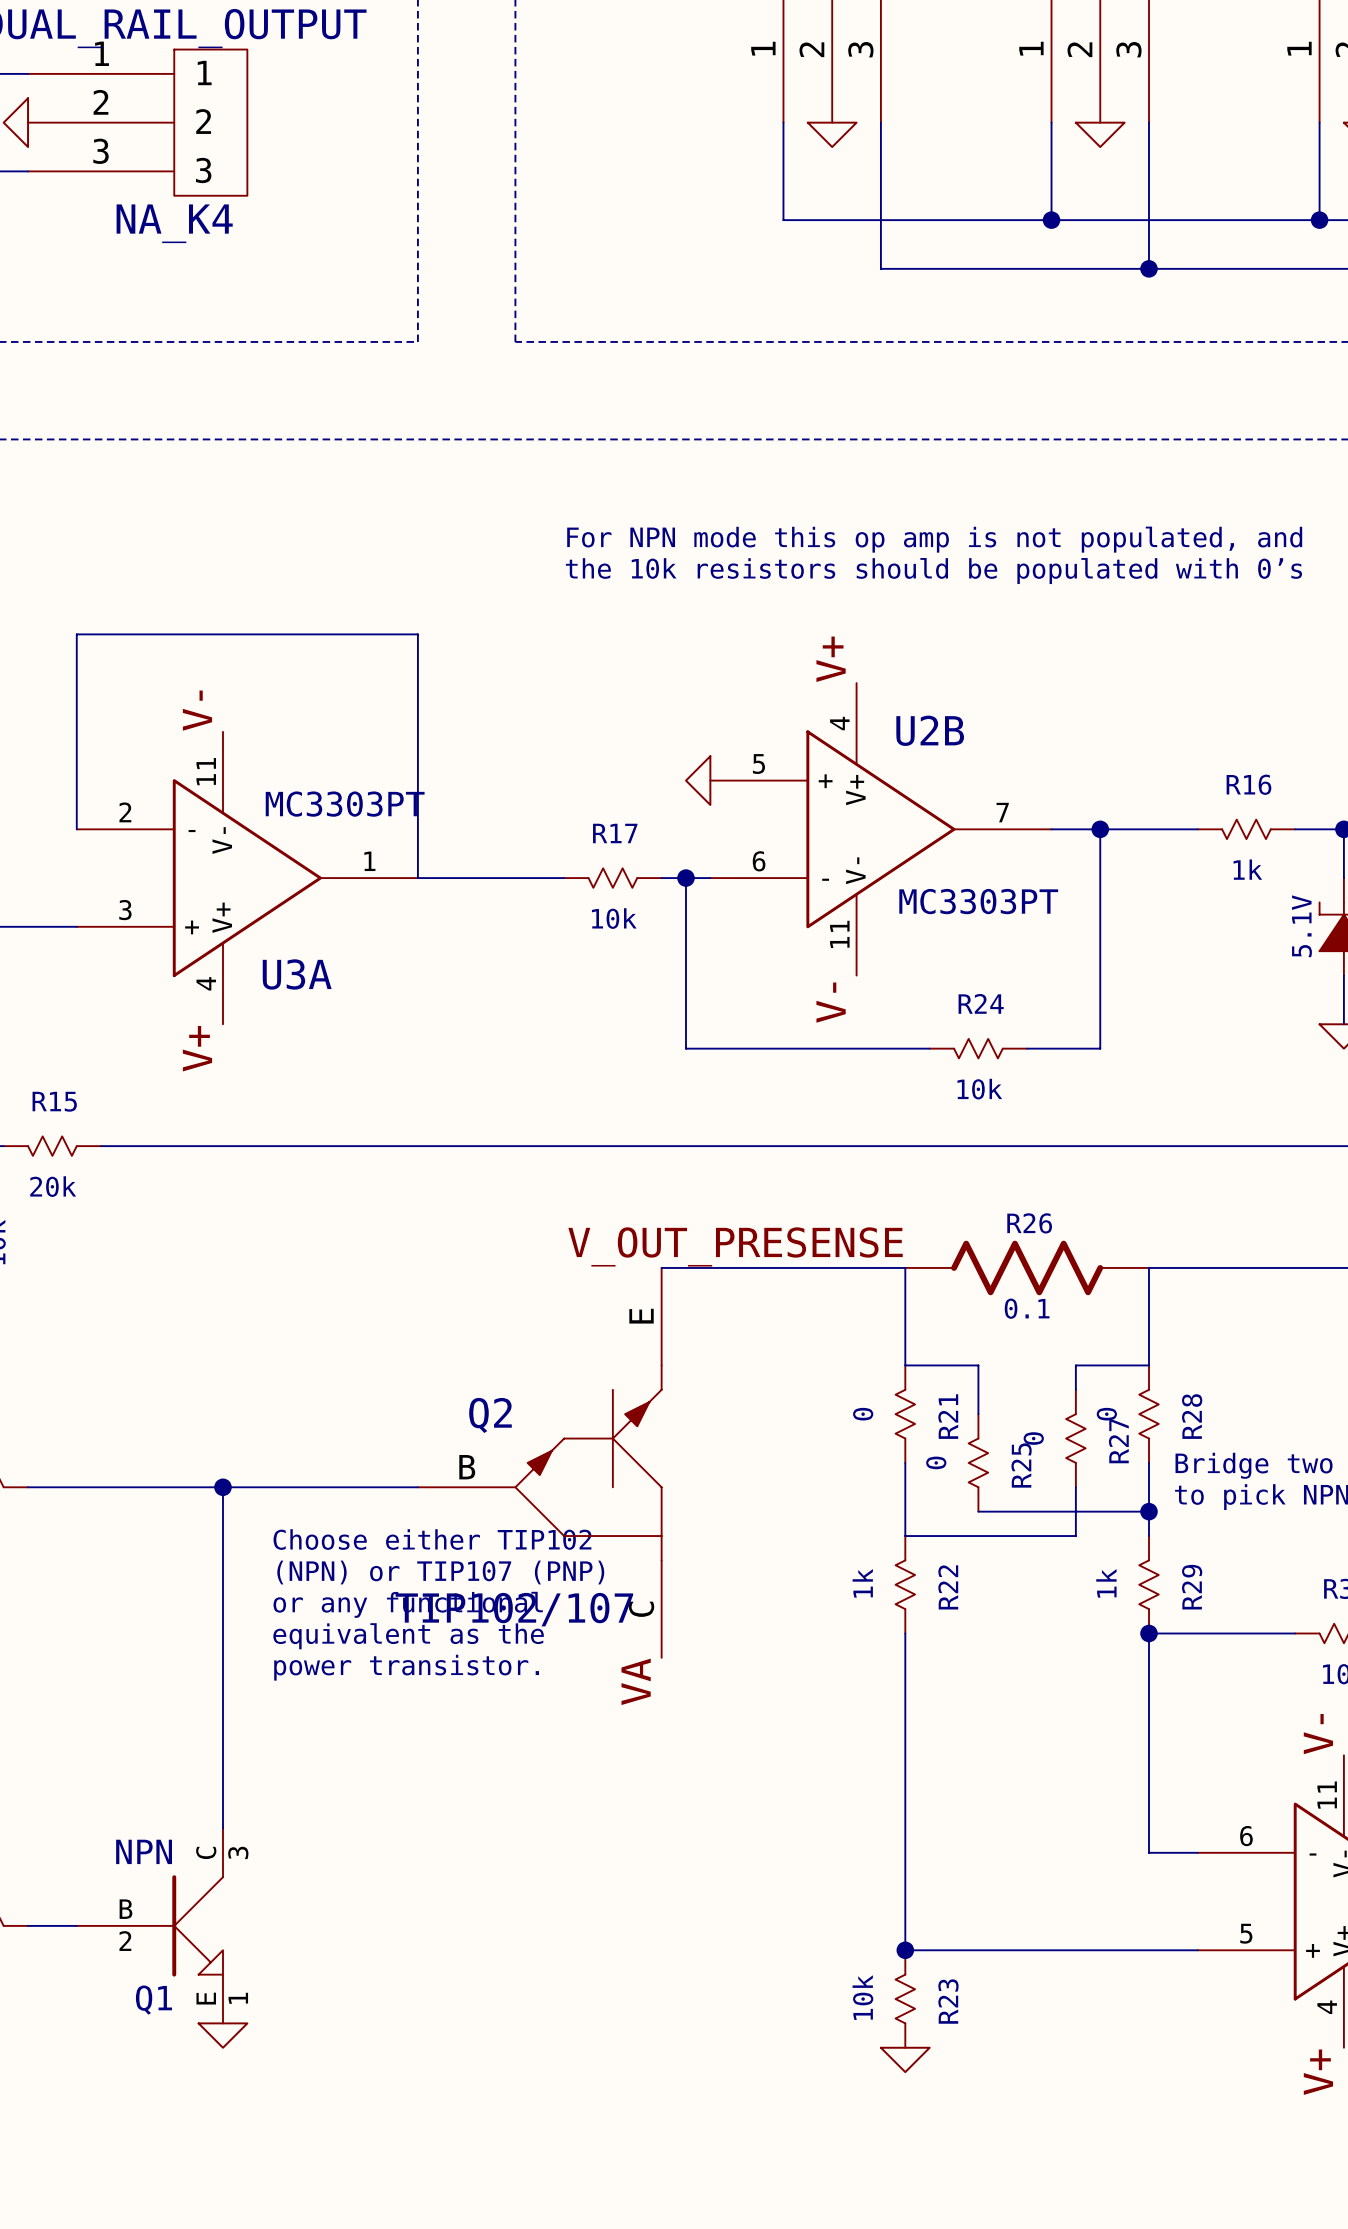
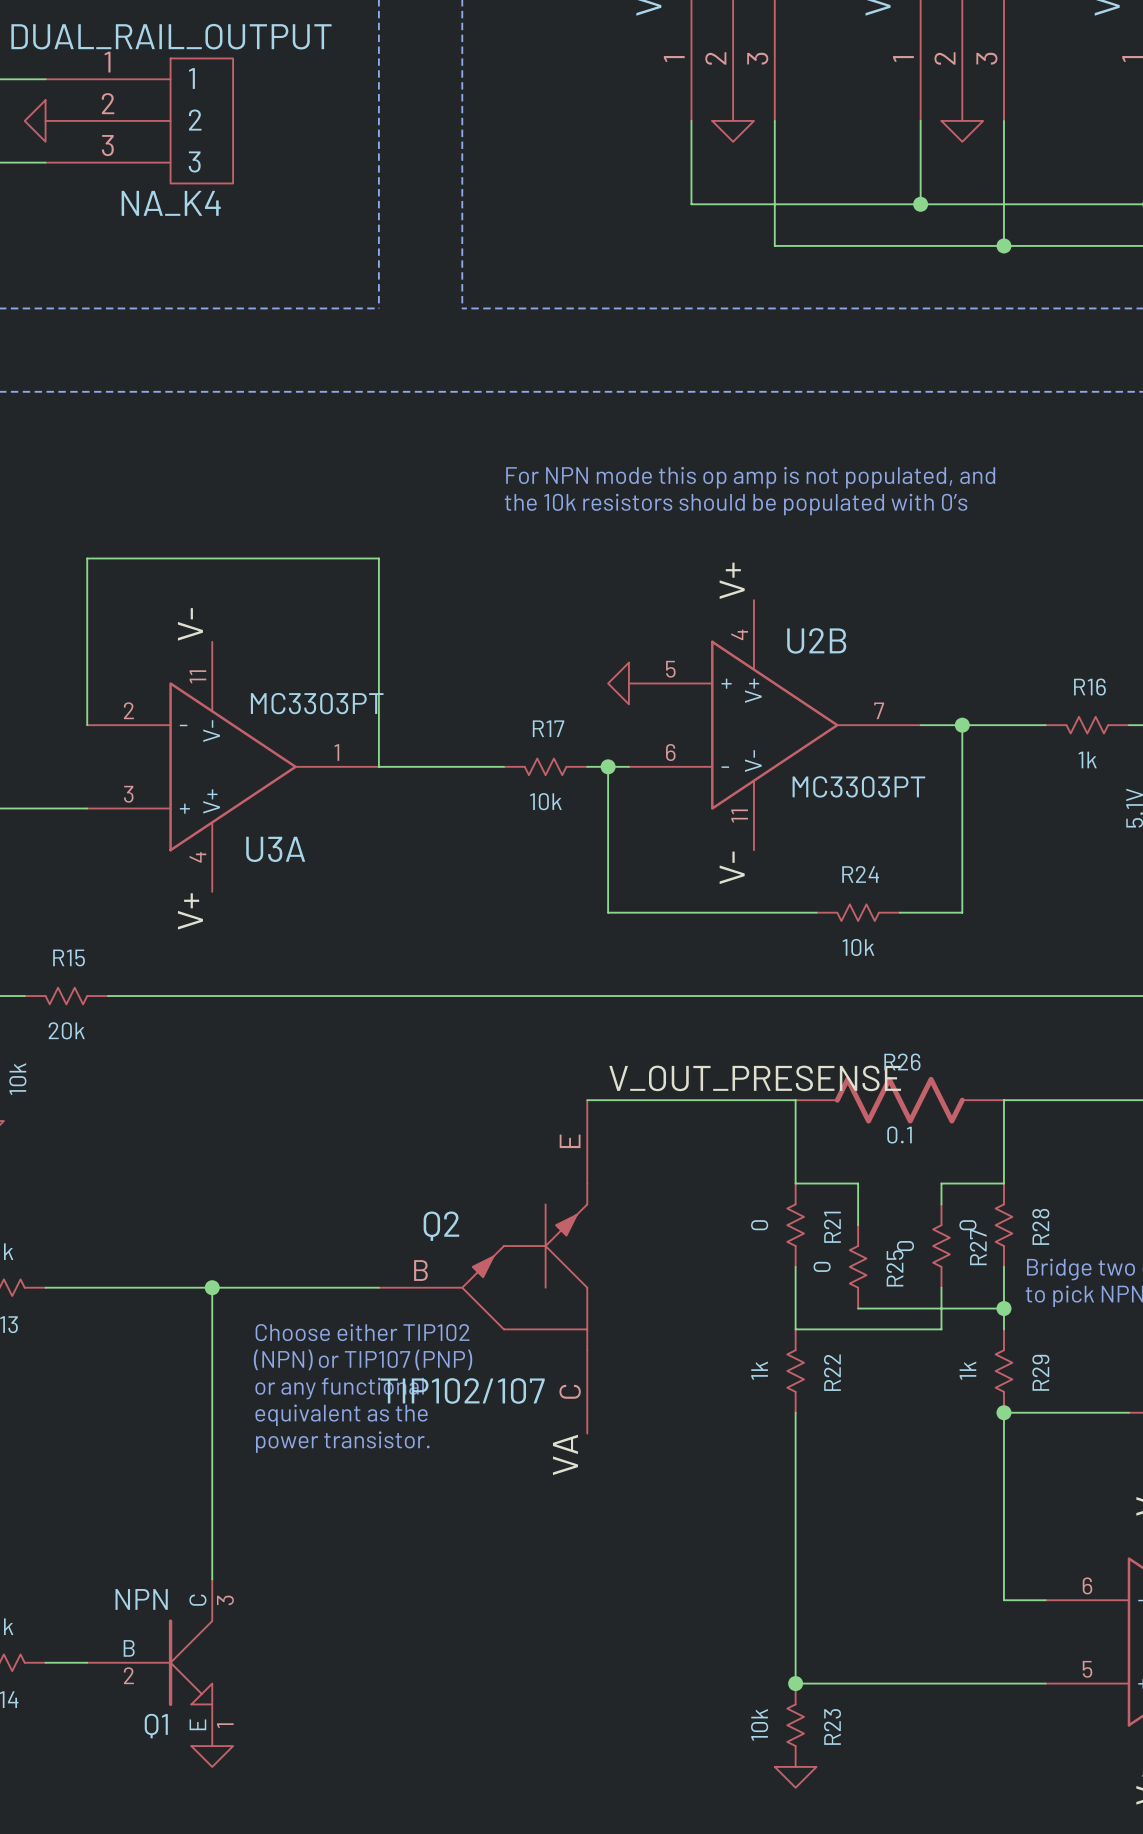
label position: V_OUT_PRESENSE (735, 1246) -> V_OUT_PRESENSE (755, 1078)

